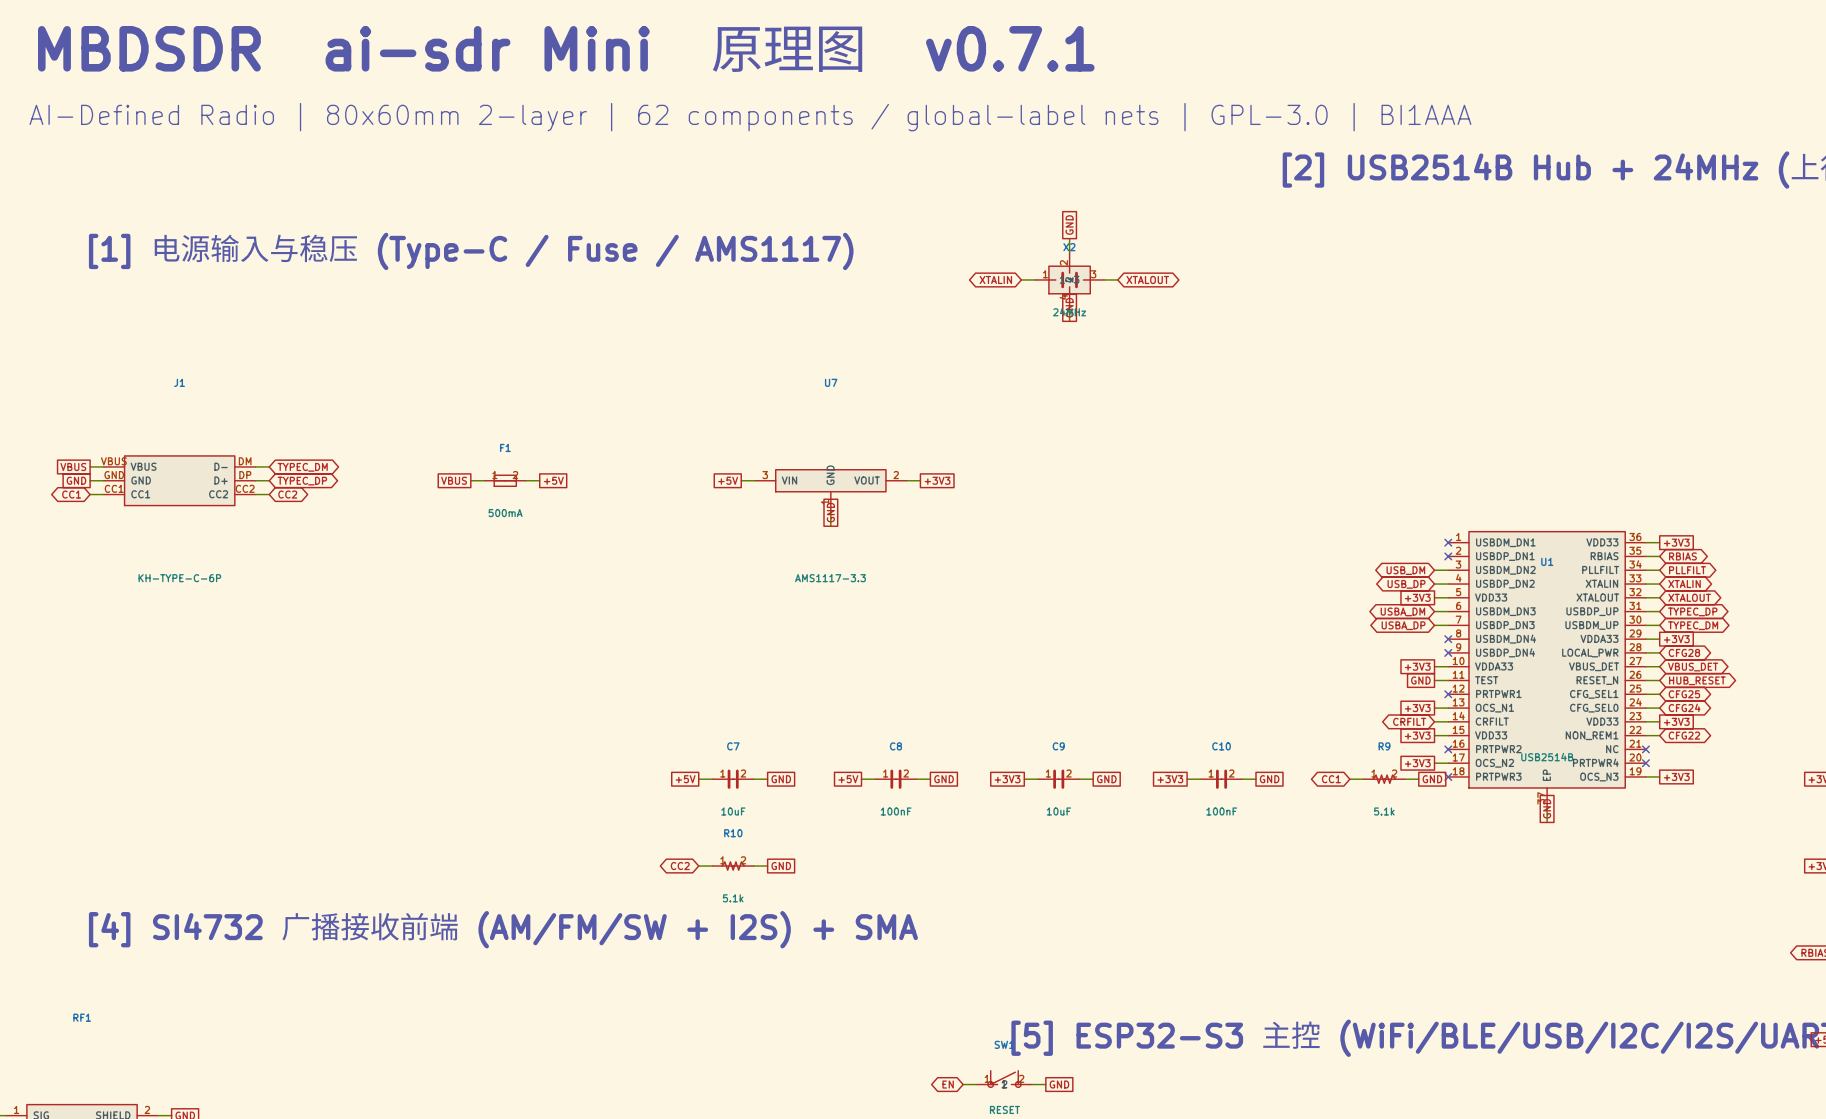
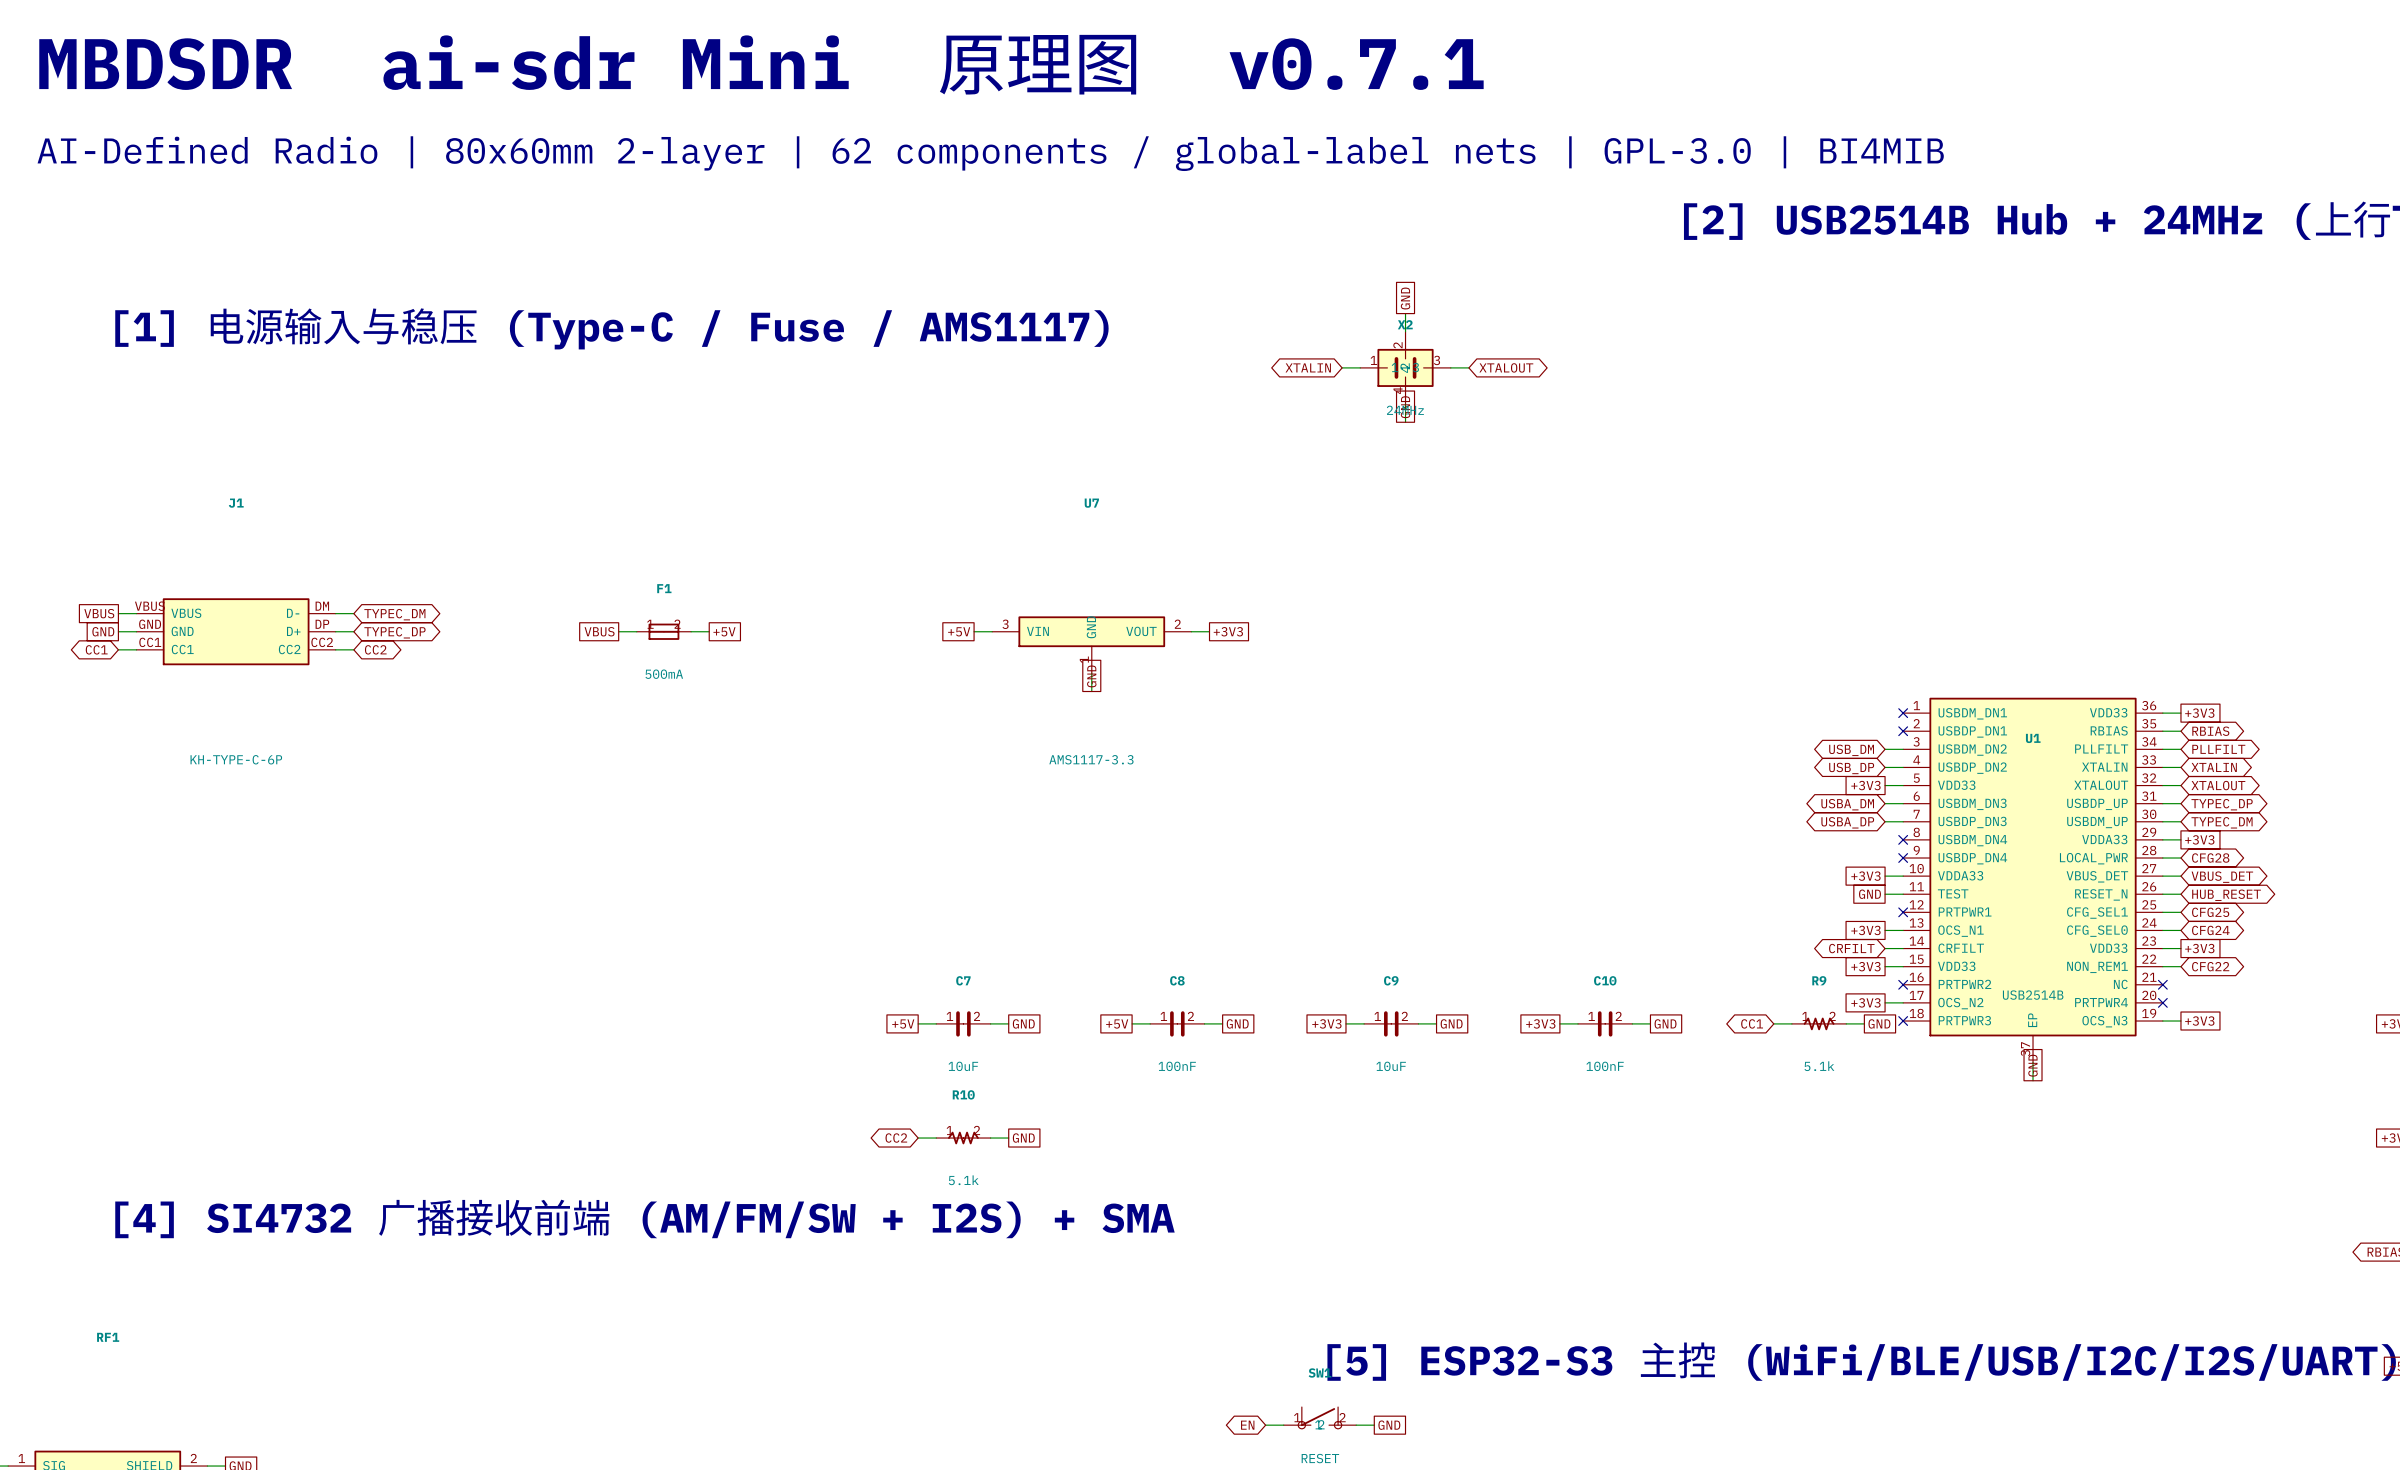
text: AI-Defined Radio | 80x60mm 2-layer | 62 components / global-label nets | GPL-3.0 | BI1AAA (750, 117) -> AI-Defined Radio | 80x60mm 2-layer | 62 components / global-label nets | GPL-3.0 | BI4MIB (990, 153)

